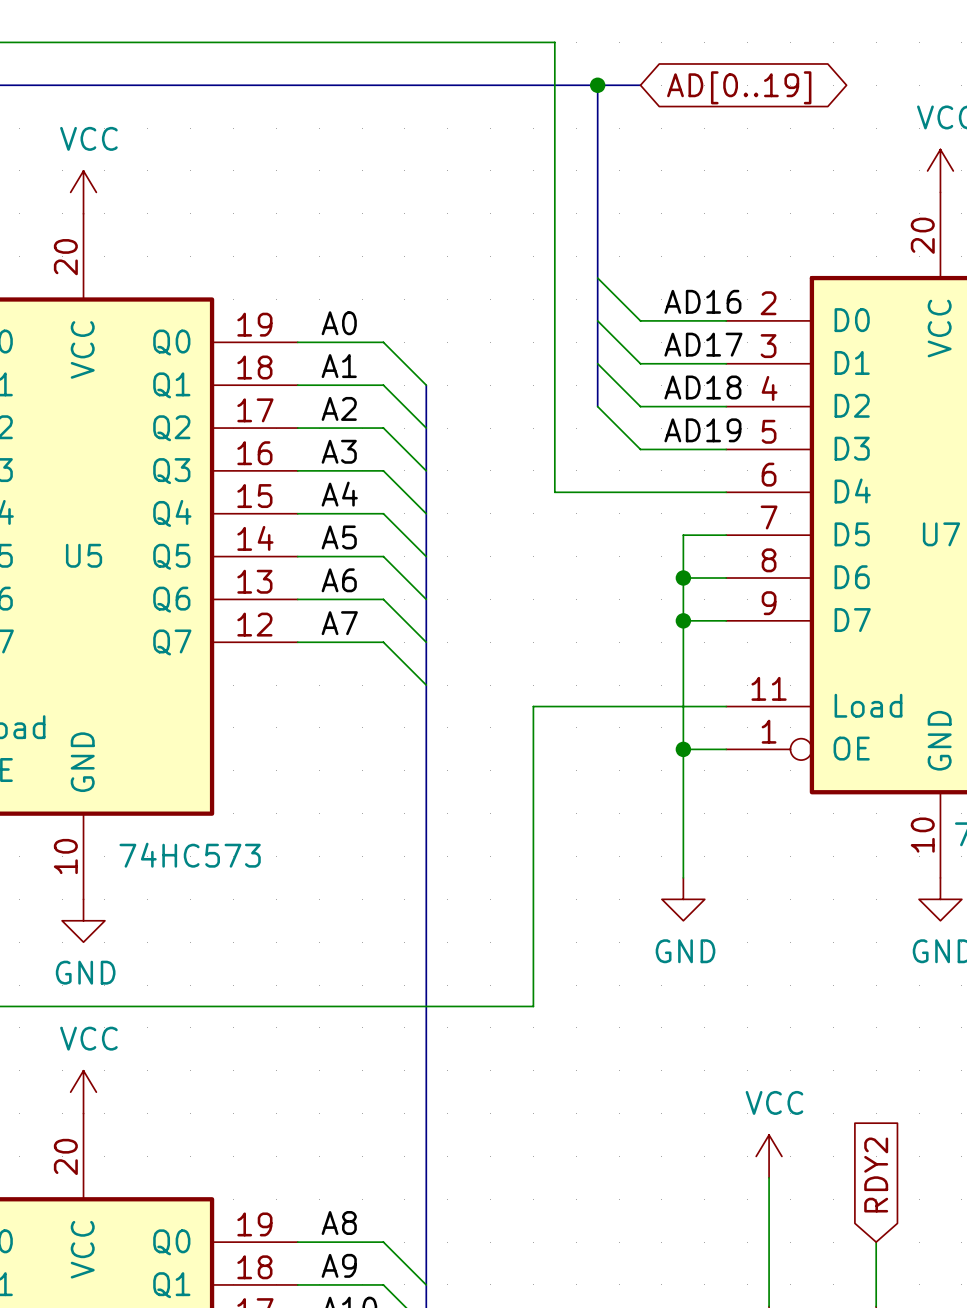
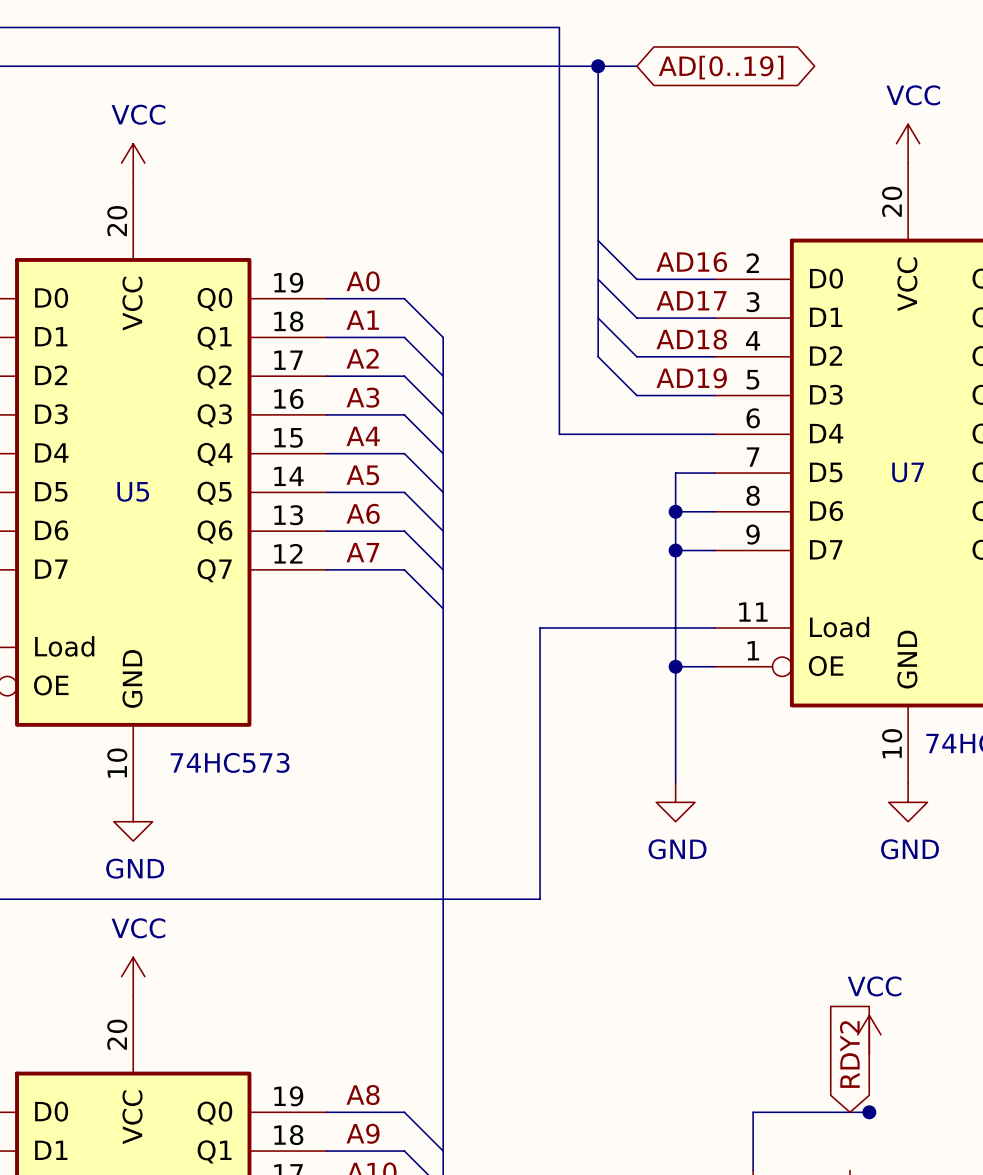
power symbol position: VCC (769, 1156) -> VCC (869, 1034)
wire: (769, 1177) (769, 1242) -> (869, 1112) (753, 1112)
wire: (876, 1242) (876, 1306) -> none
junction: none -> (869, 1112)

